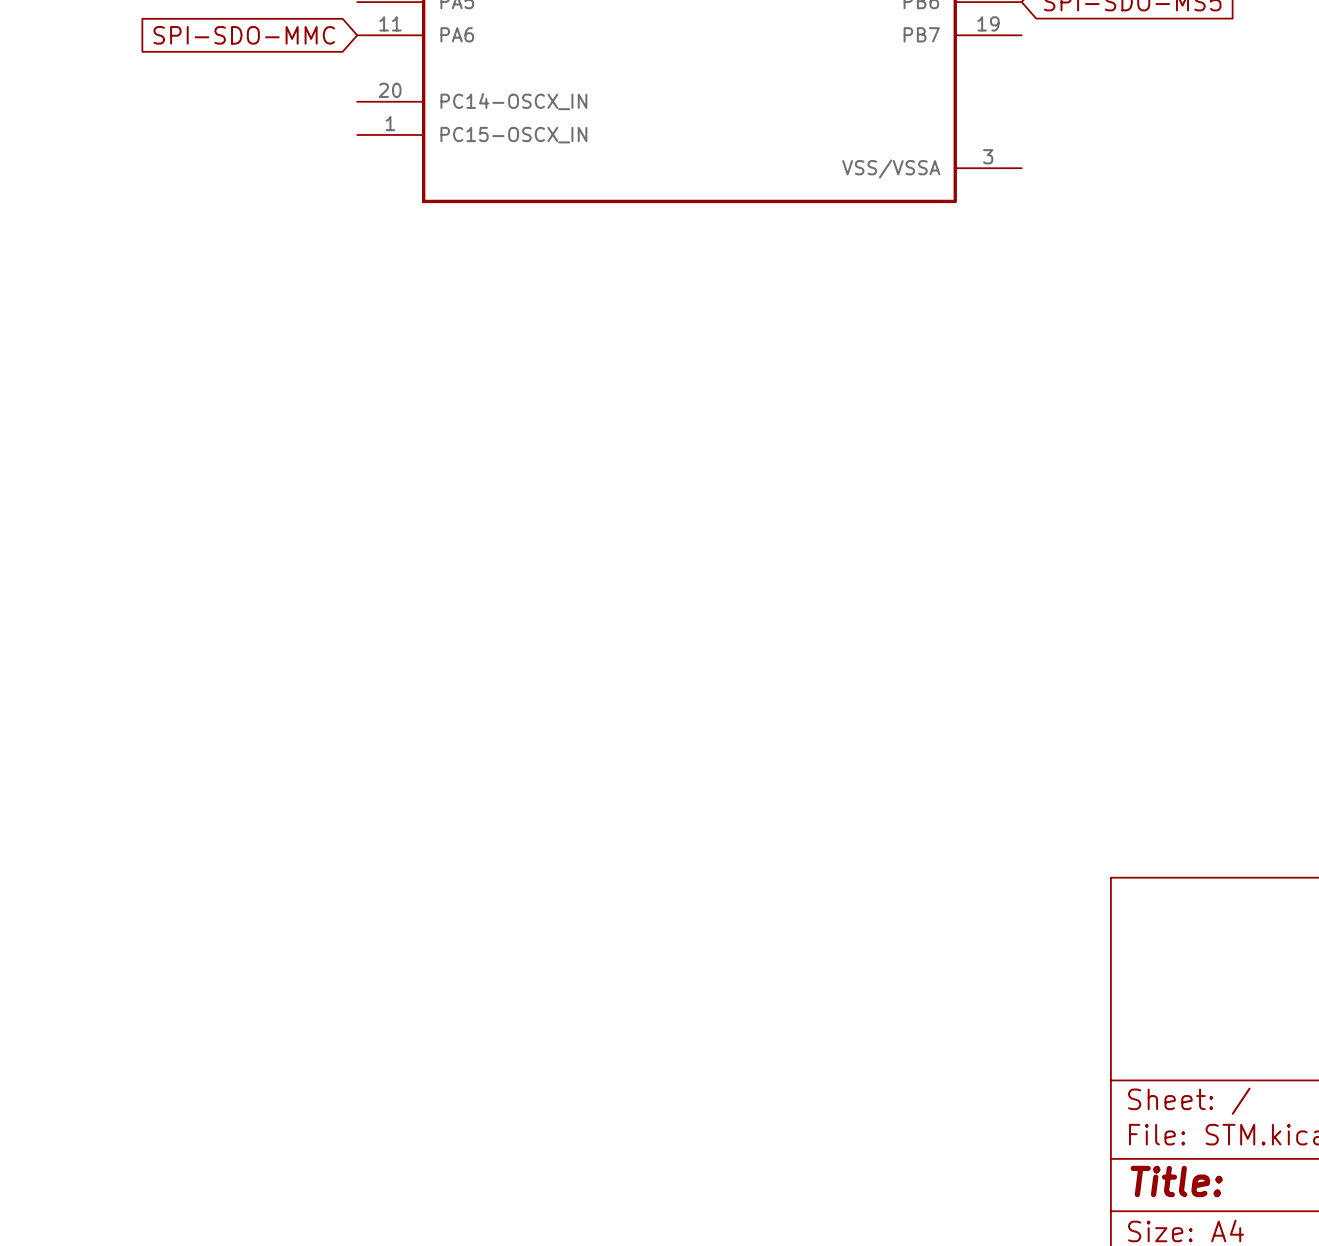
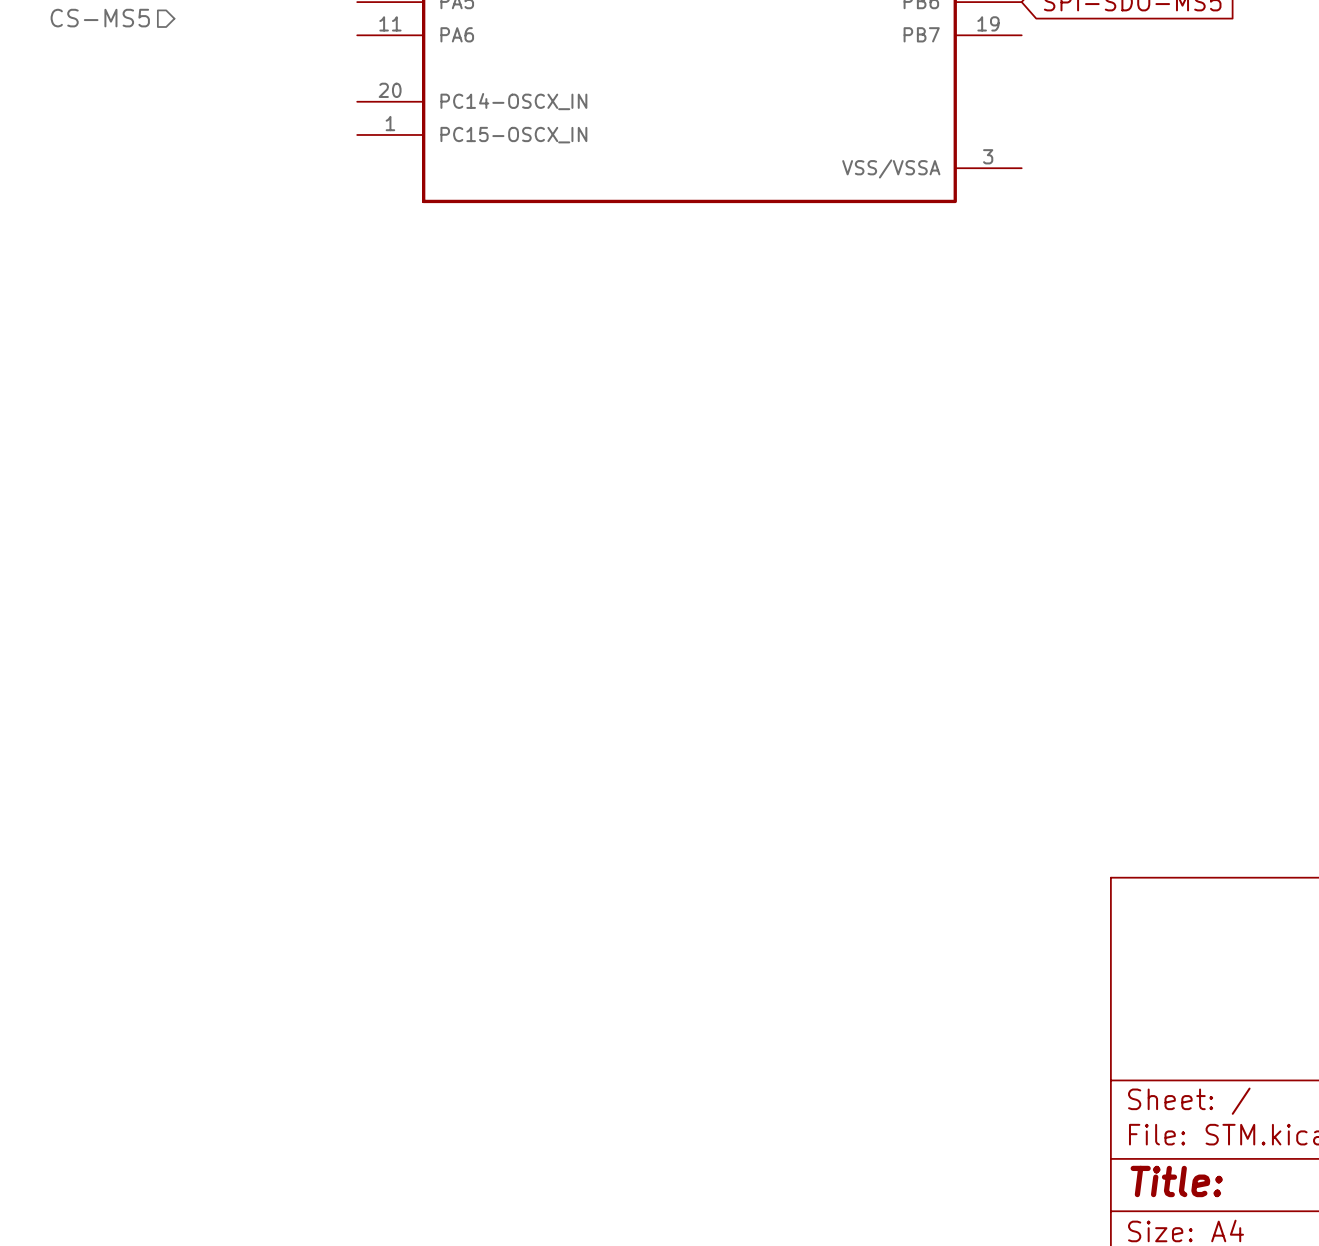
hierarchical label: none -> CS-MS5 (100, 18)
global label: SPI-SDO-MMC (244, 35) -> none

